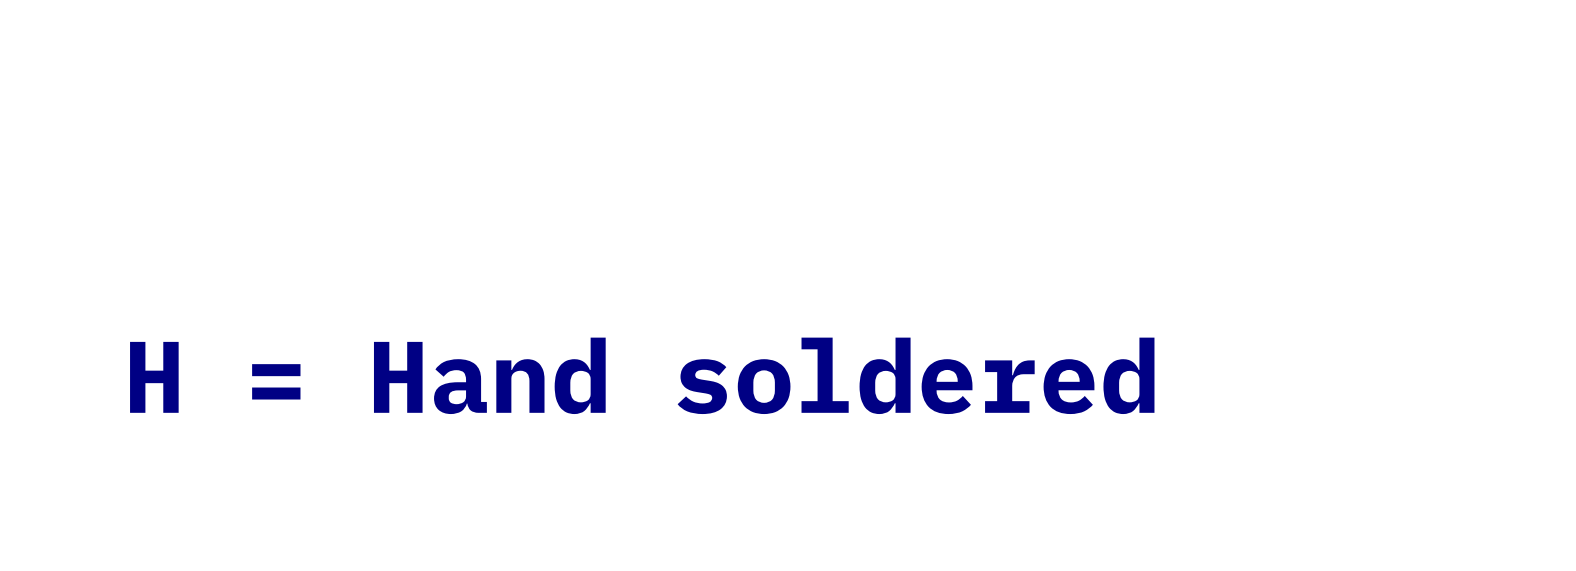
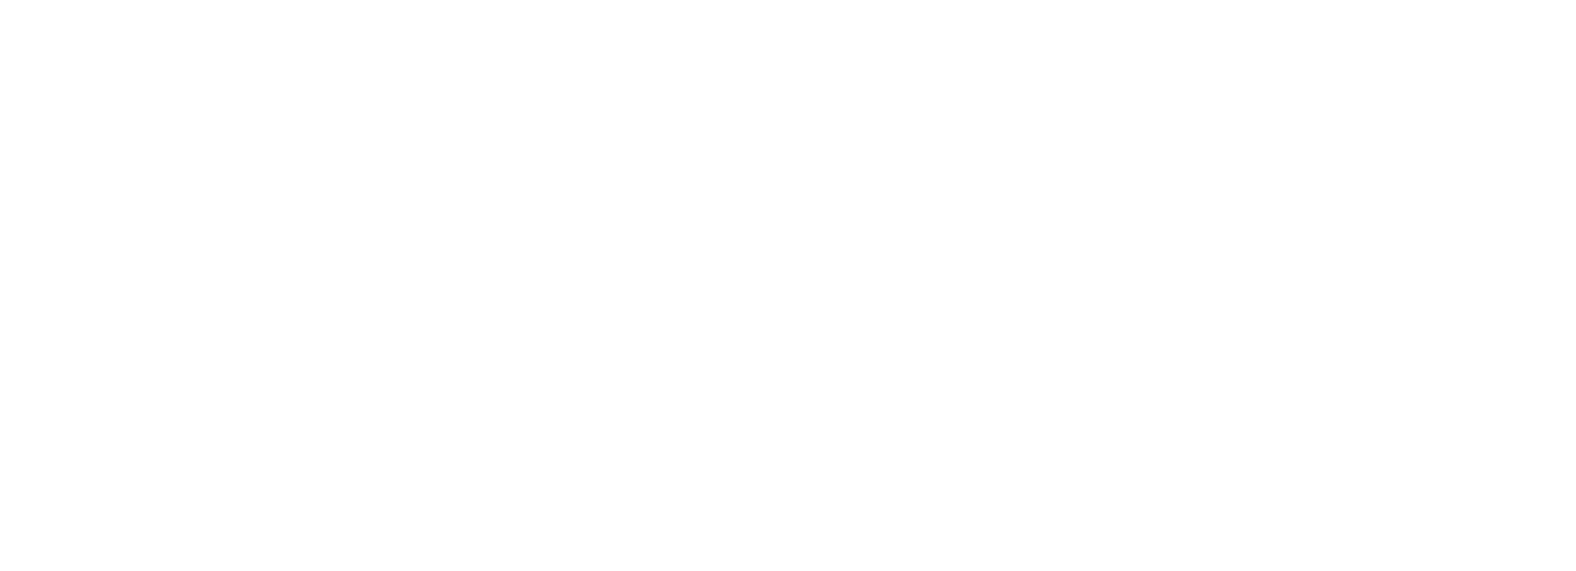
text: H = Hand soldered (642, 375) -> none

